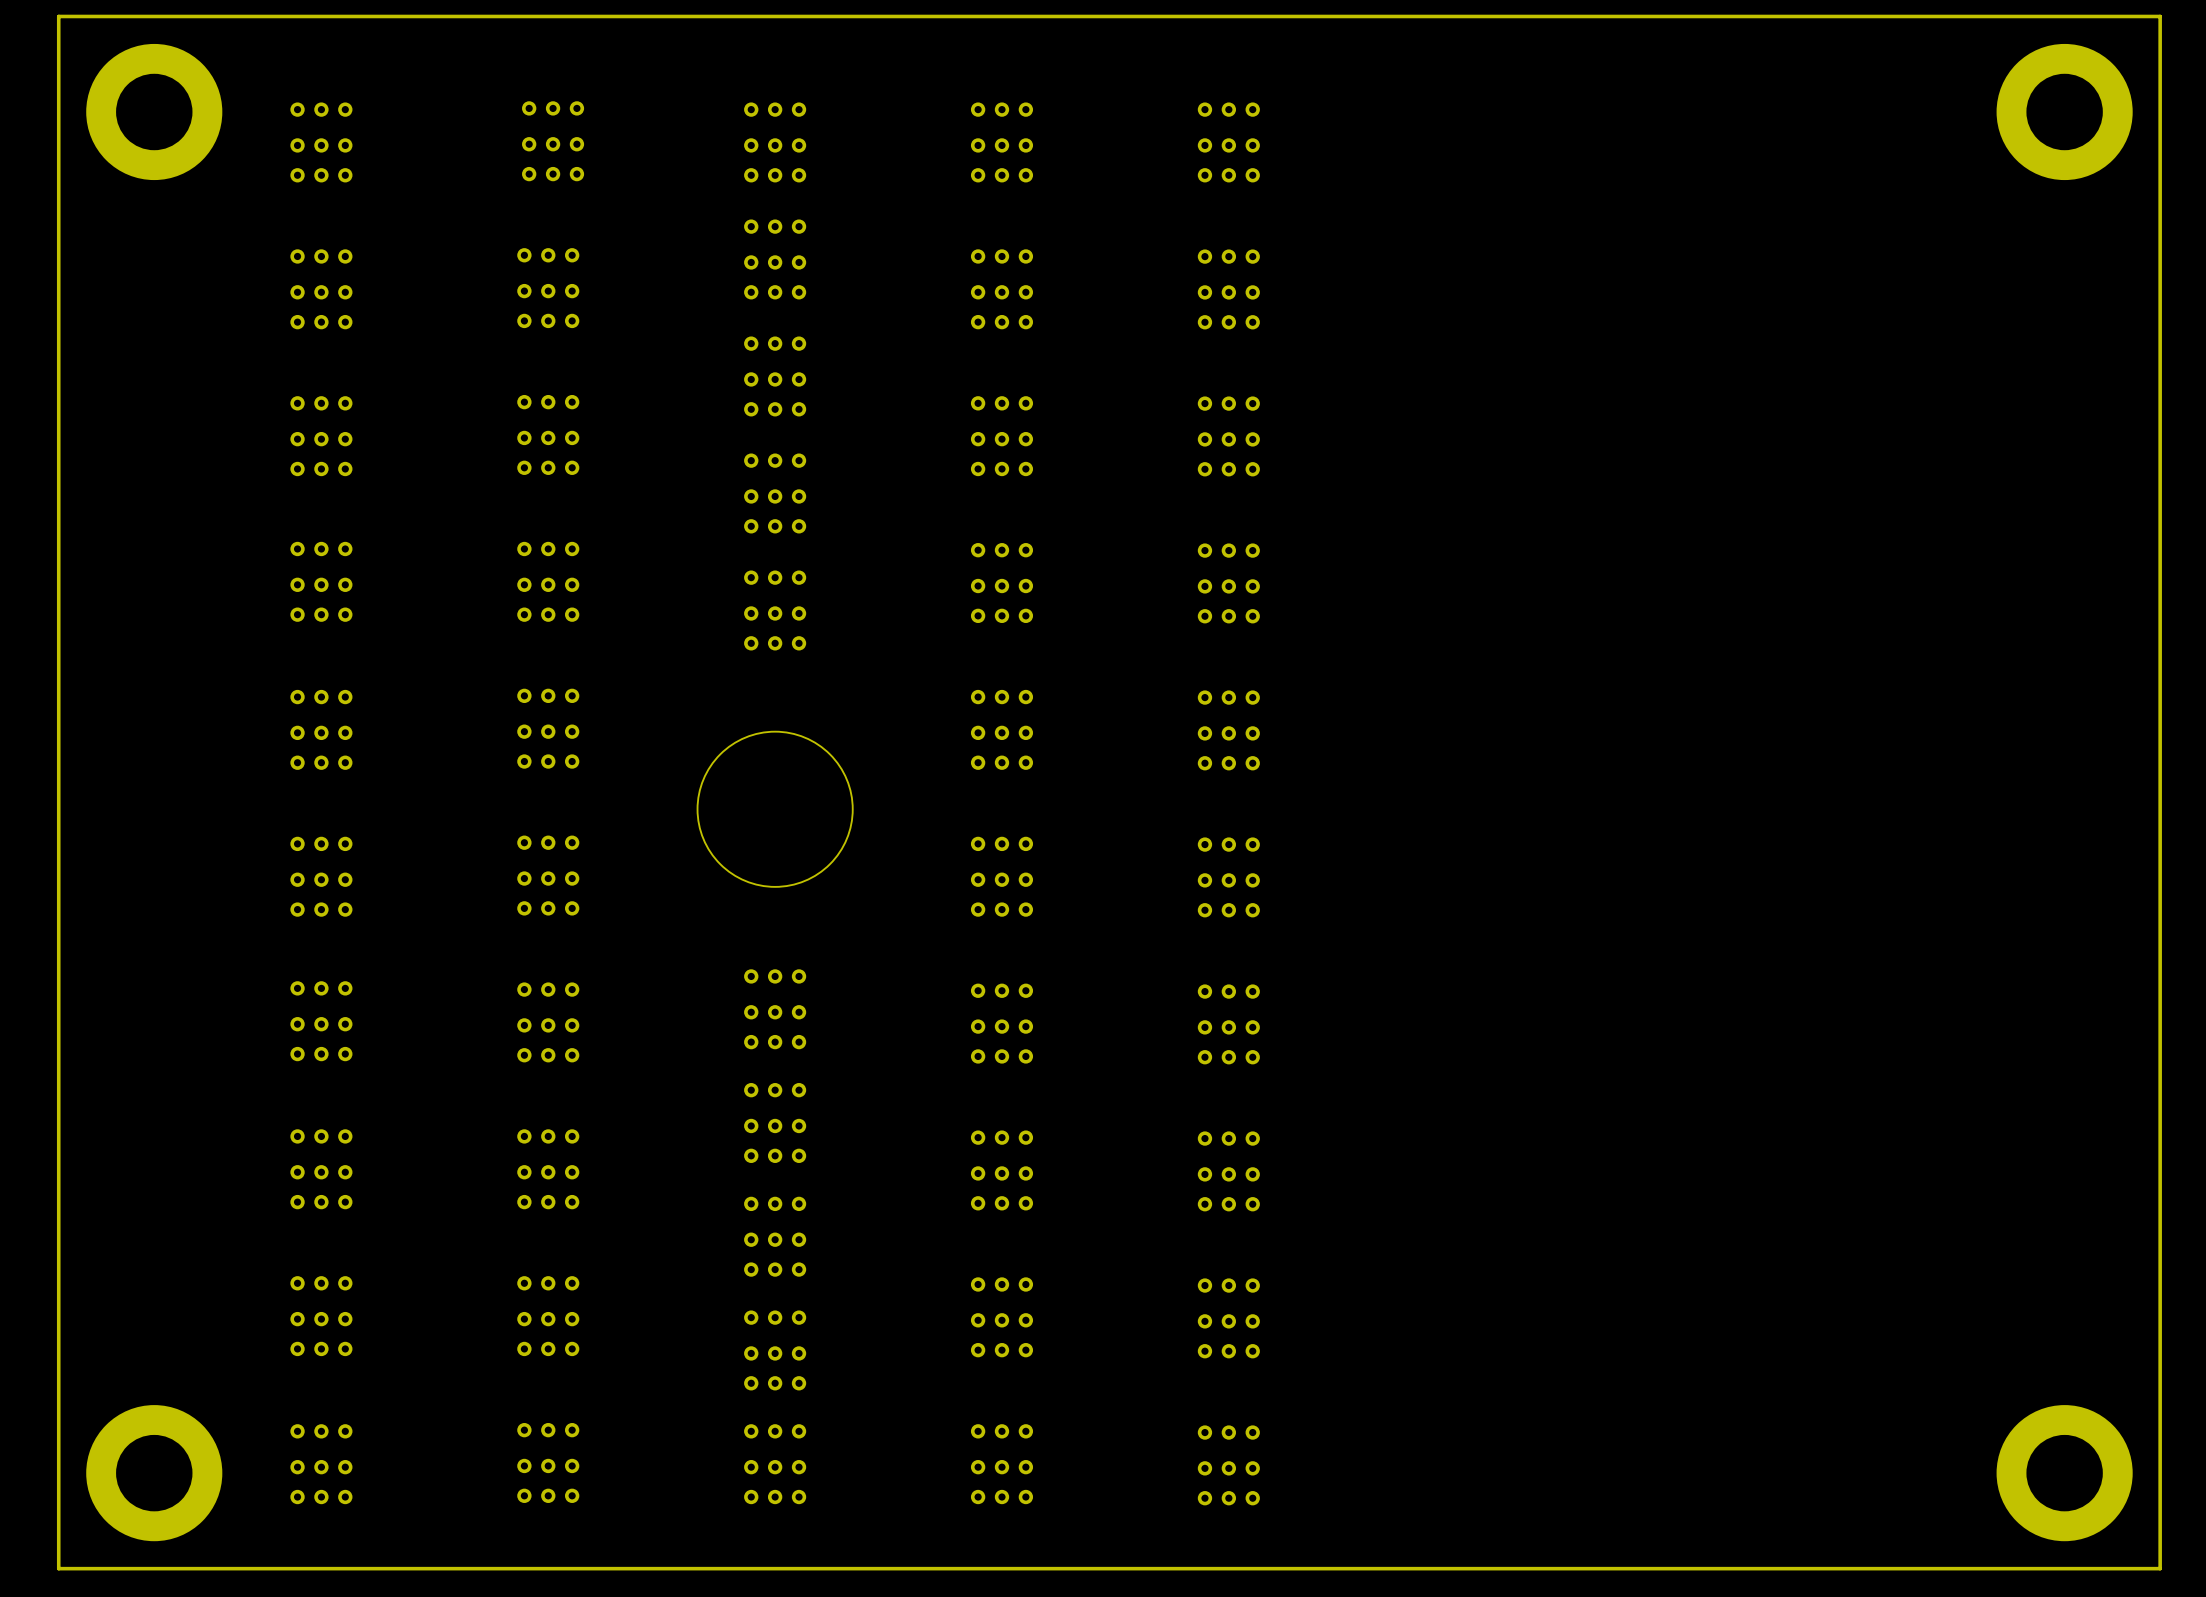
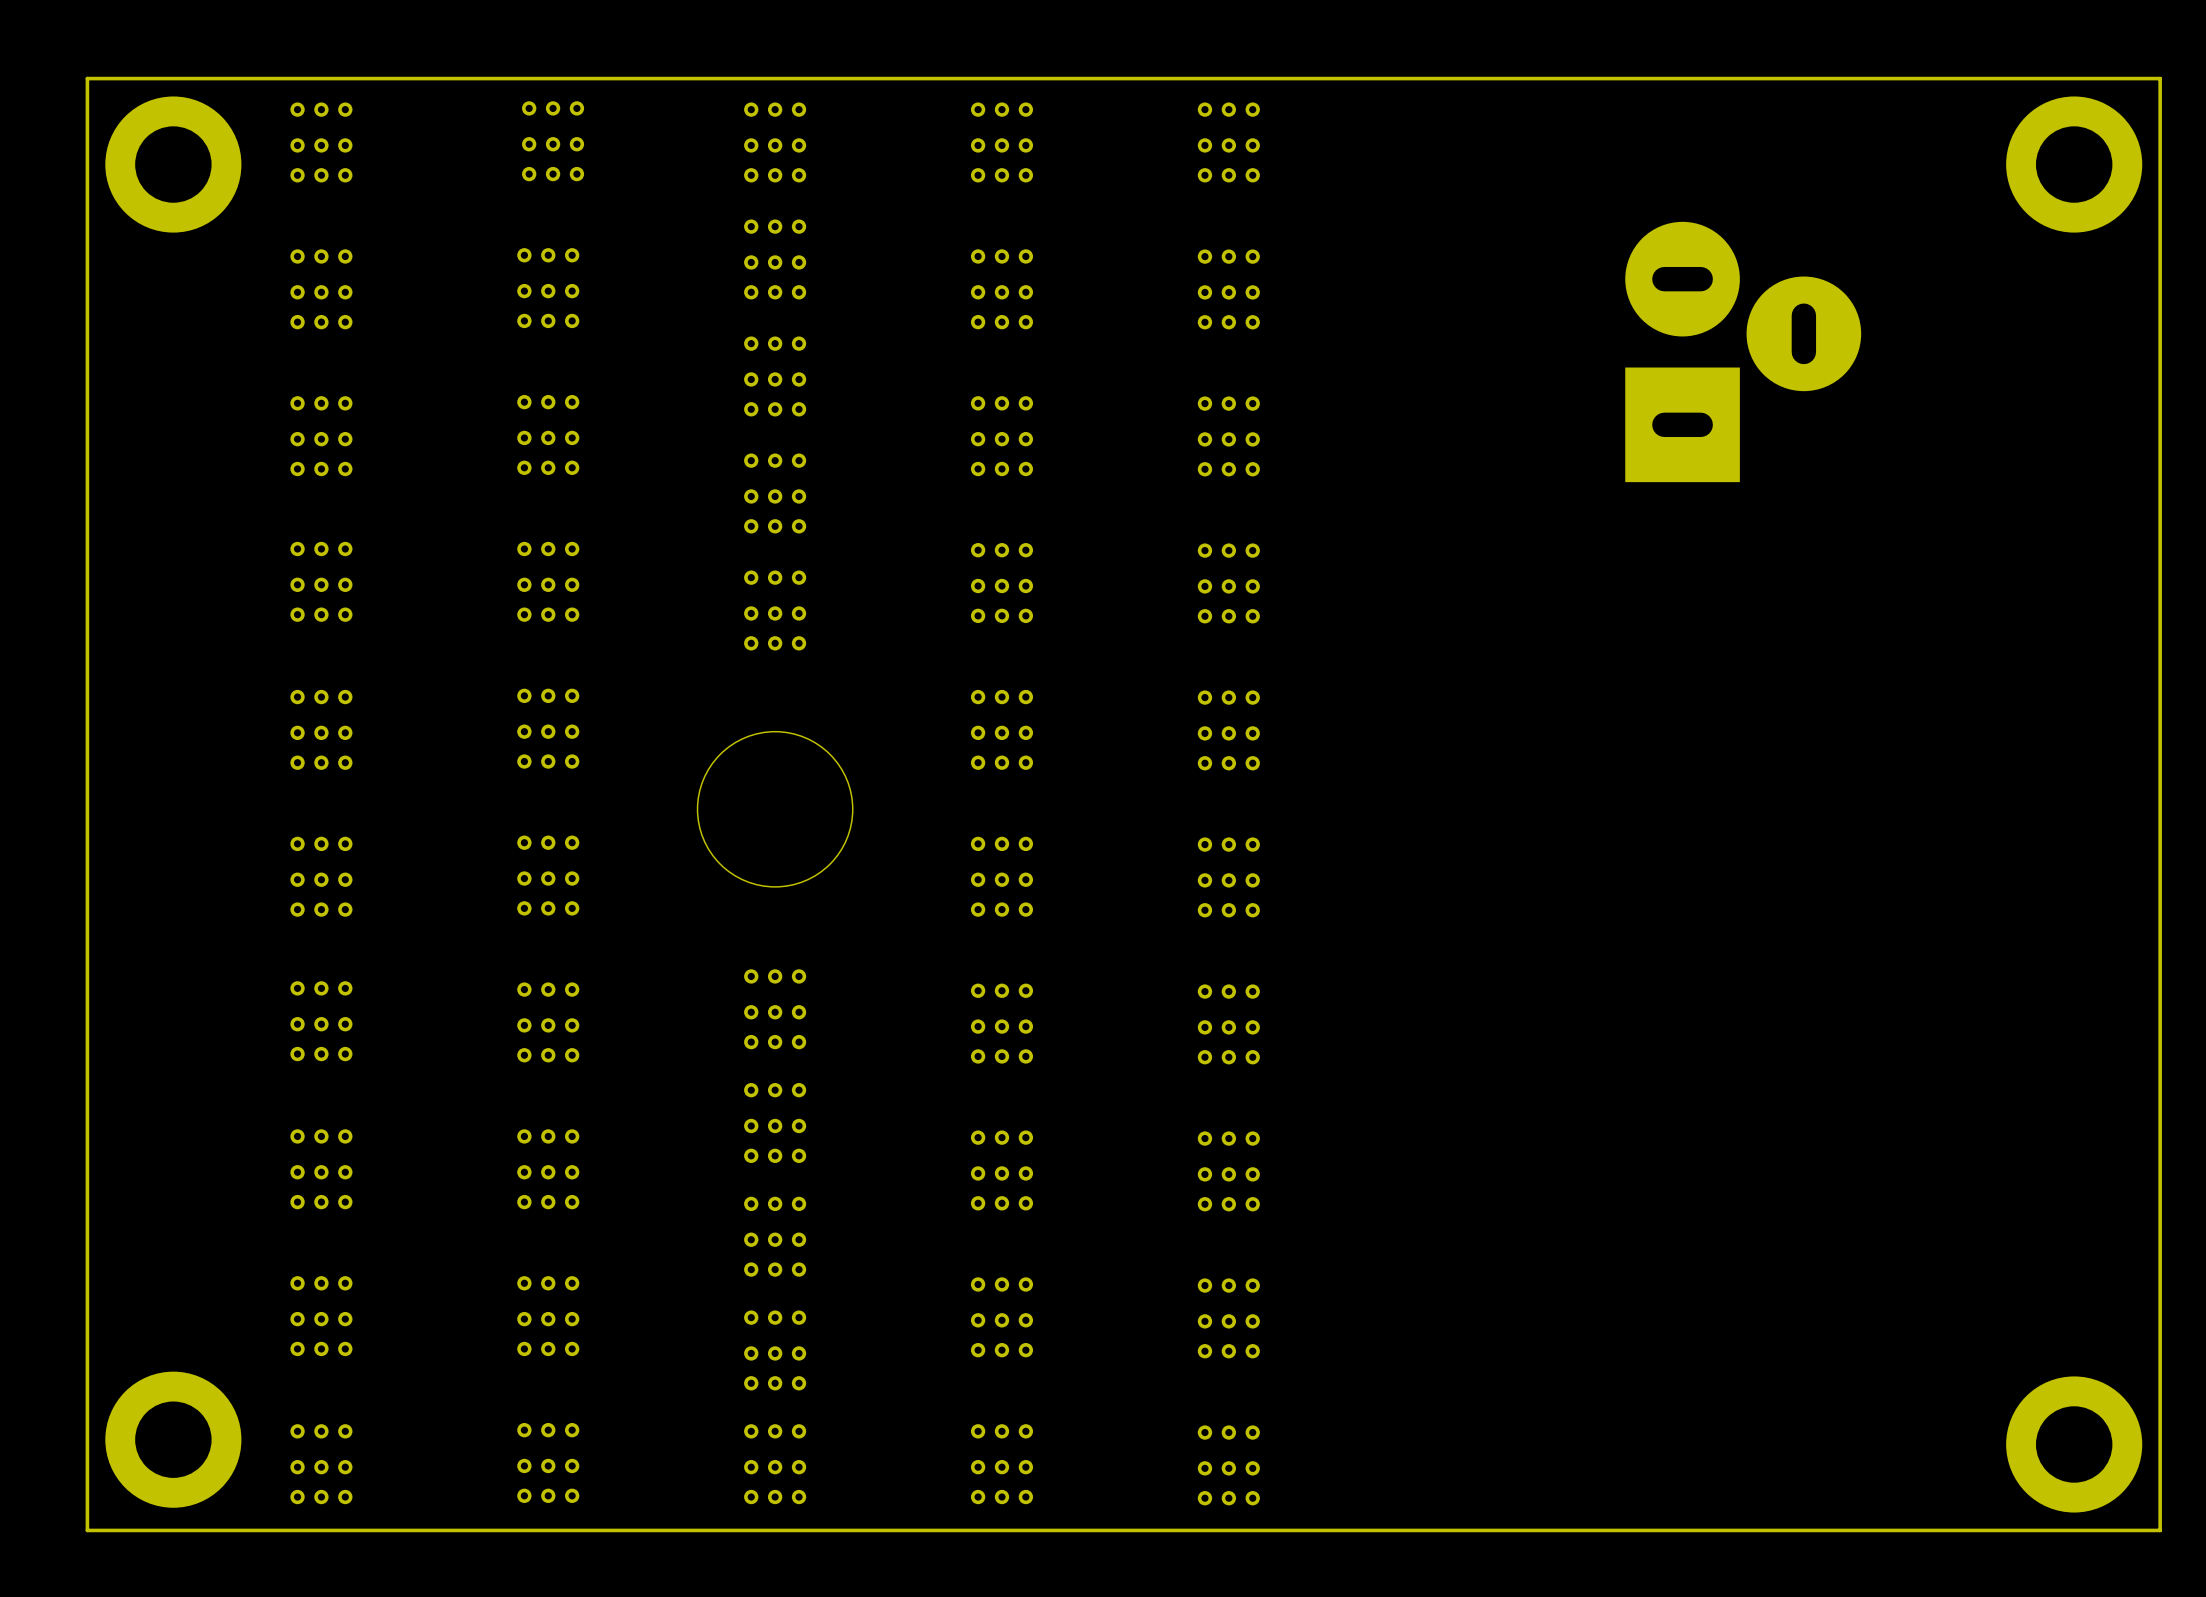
board edge: (2160, 78) (2160, 16) (58, 16) (58, 1568) (2160, 1568) (2160, 1530) -> (2160, 78) (87, 78) (87, 1530) (2160, 1530)
part position: (154, 112) -> (173, 164)
part position: (2064, 112) -> (2074, 164)
part: none -> (1743, 351)
part position: (154, 1473) -> (173, 1439)
part position: (2064, 1473) -> (2074, 1444)

